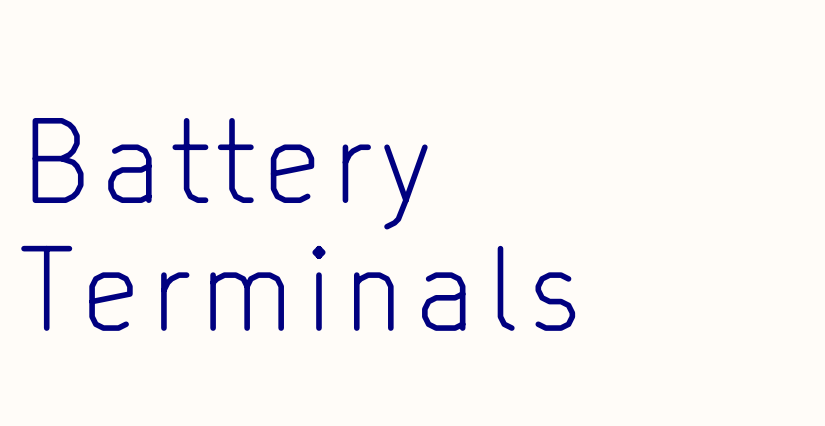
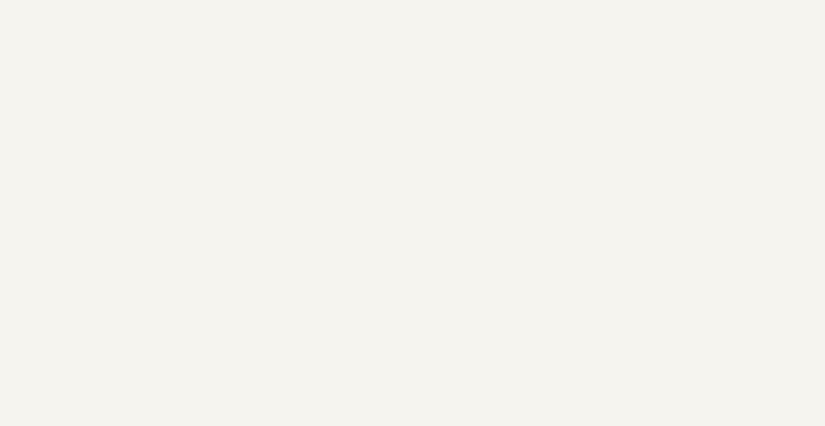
text: Battery (230, 173) -> none
text: Terminals (298, 288) -> none

